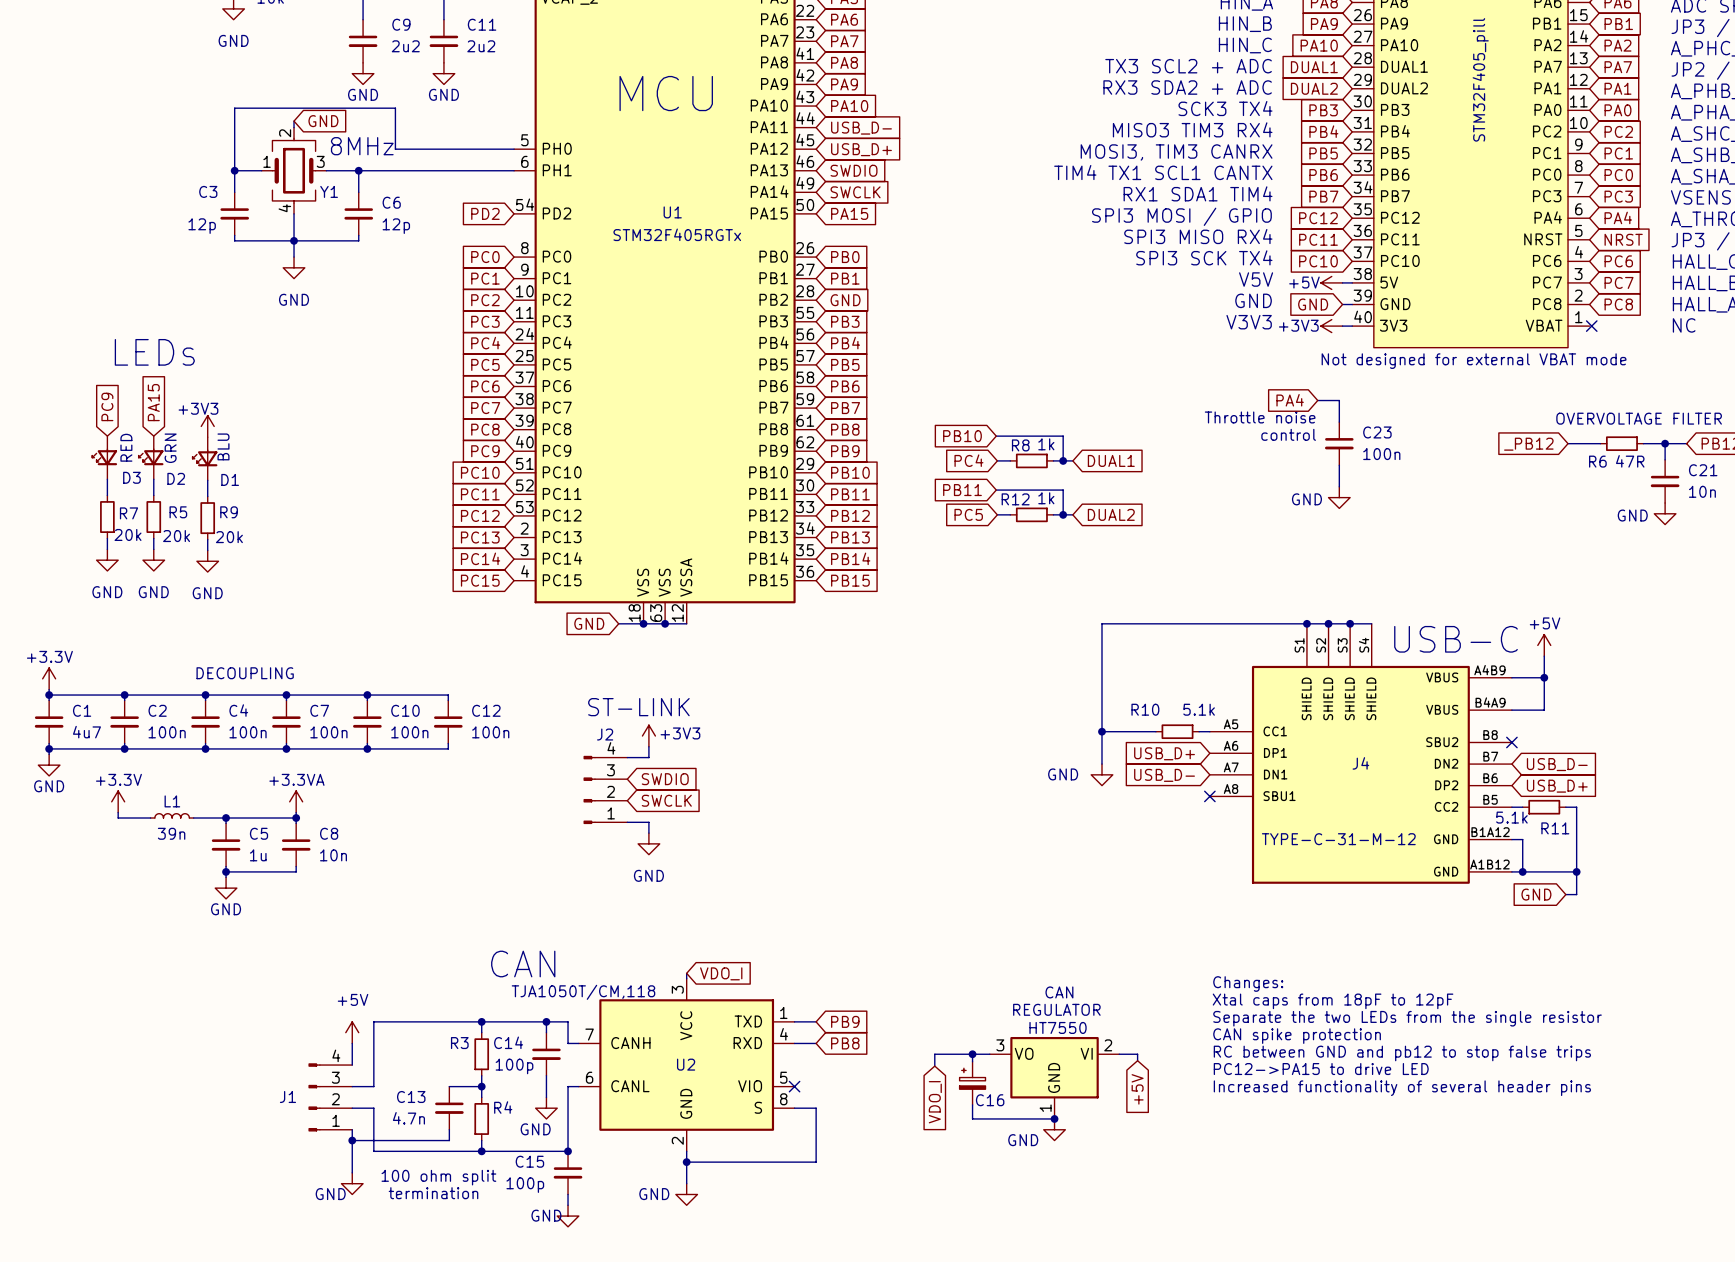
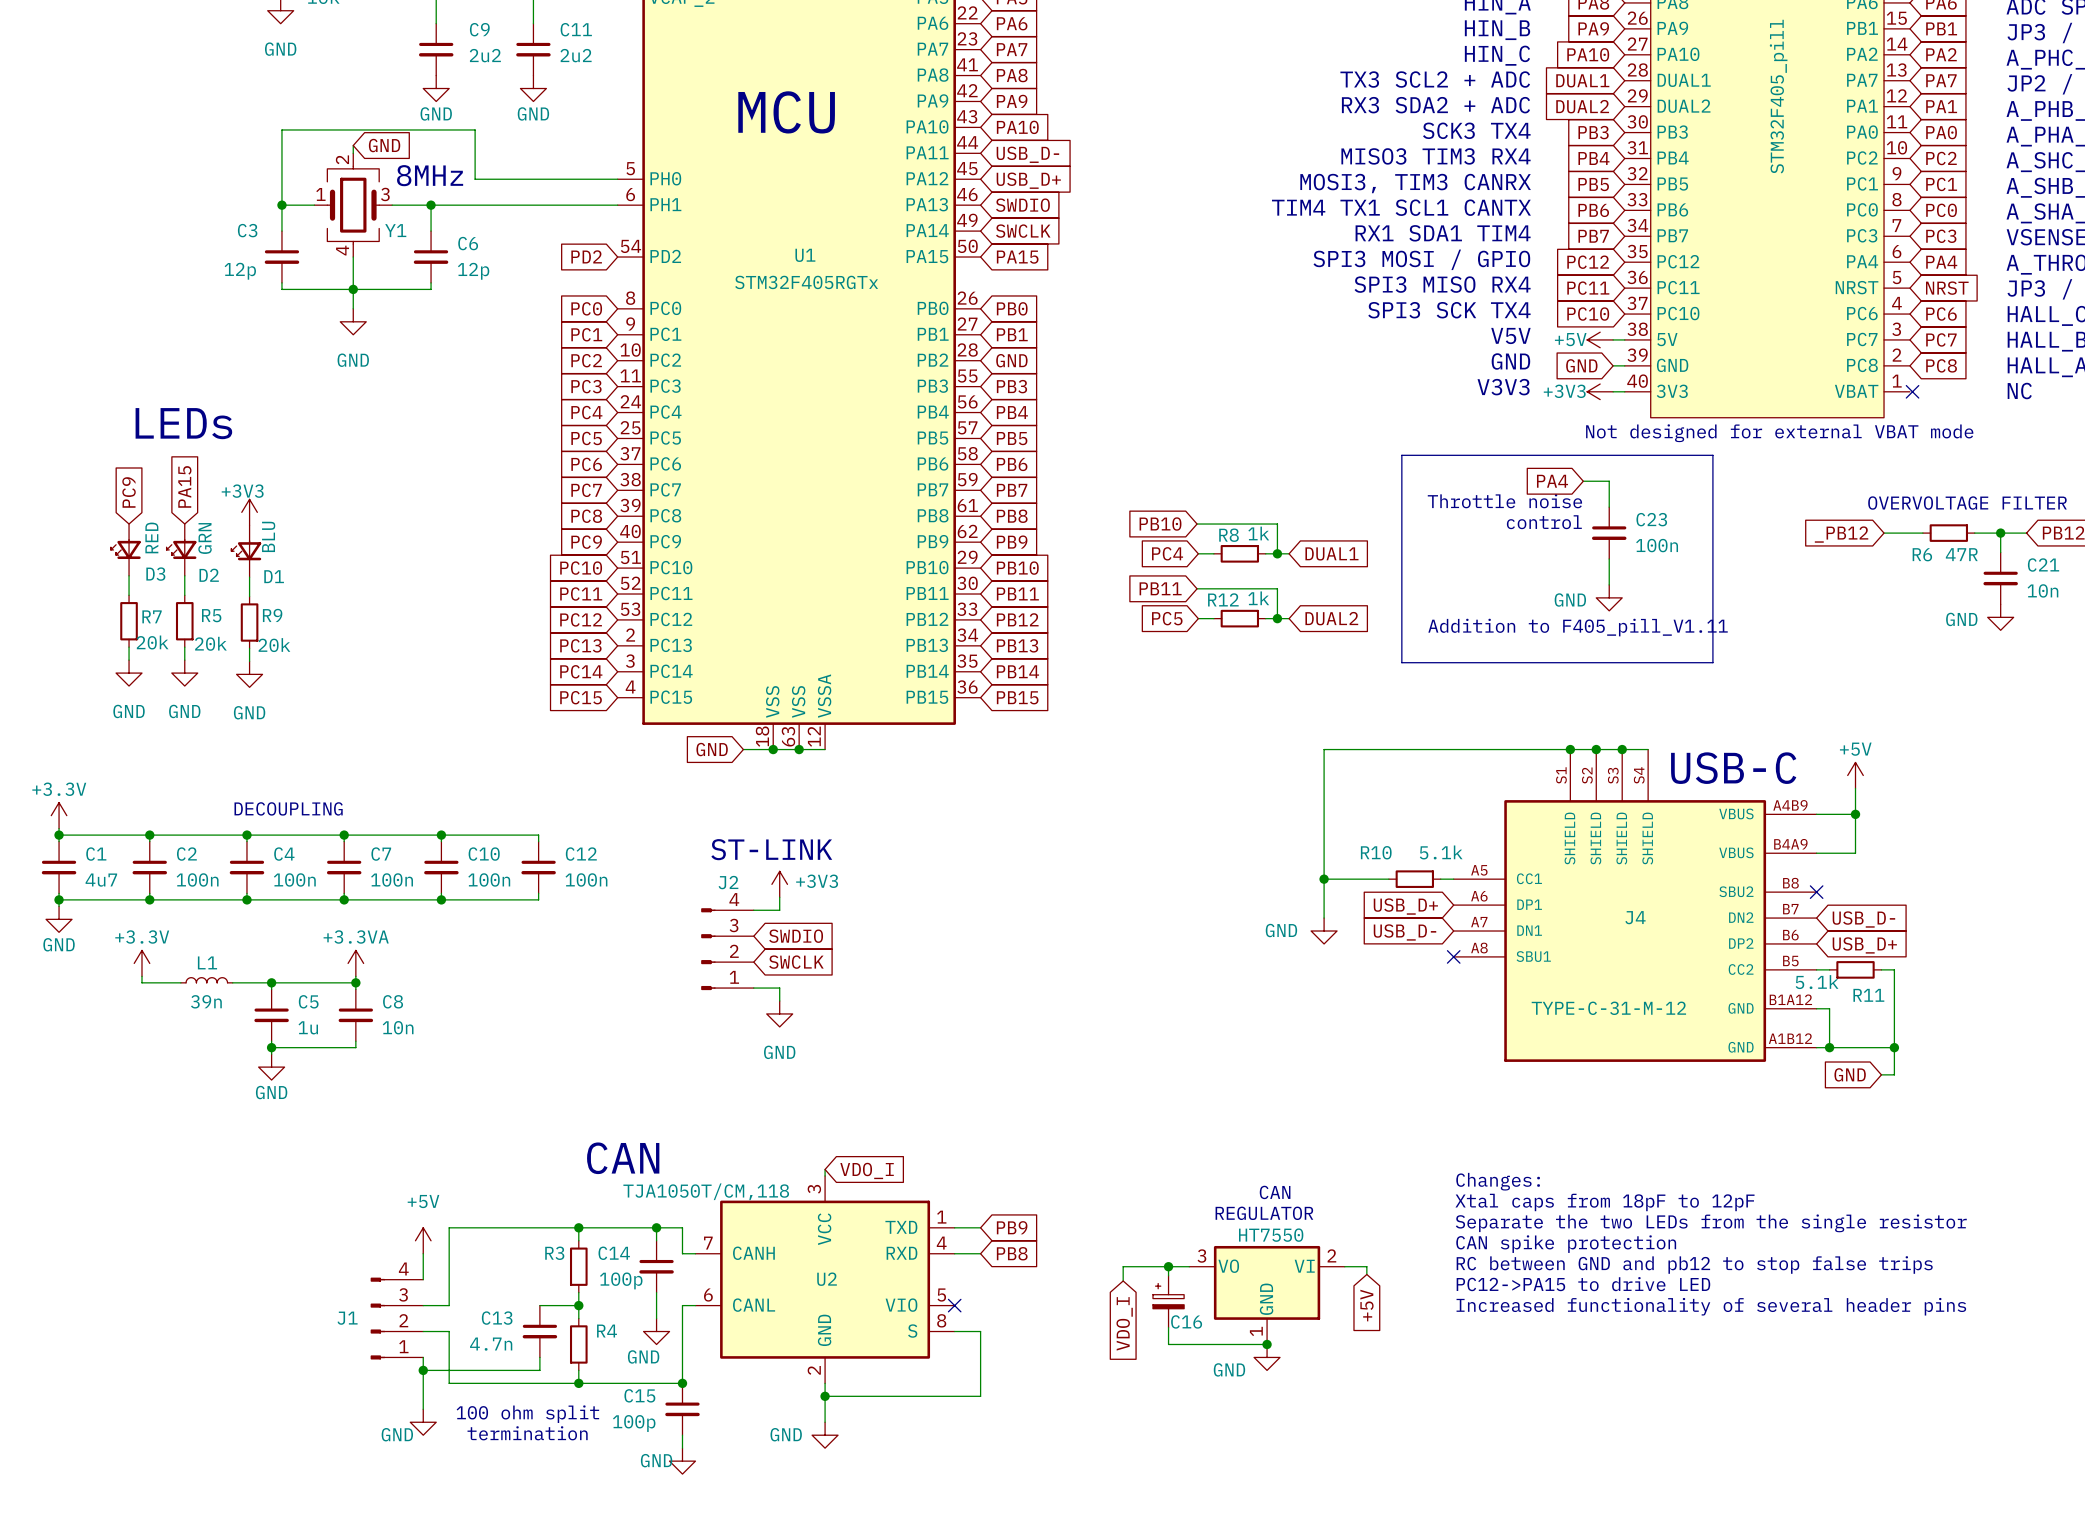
line: none -> (1401, 455) (1712, 455) (1712, 662) (1401, 662) (1401, 455)
text: none -> Addition to F405_pill_V1.11 (1578, 627)

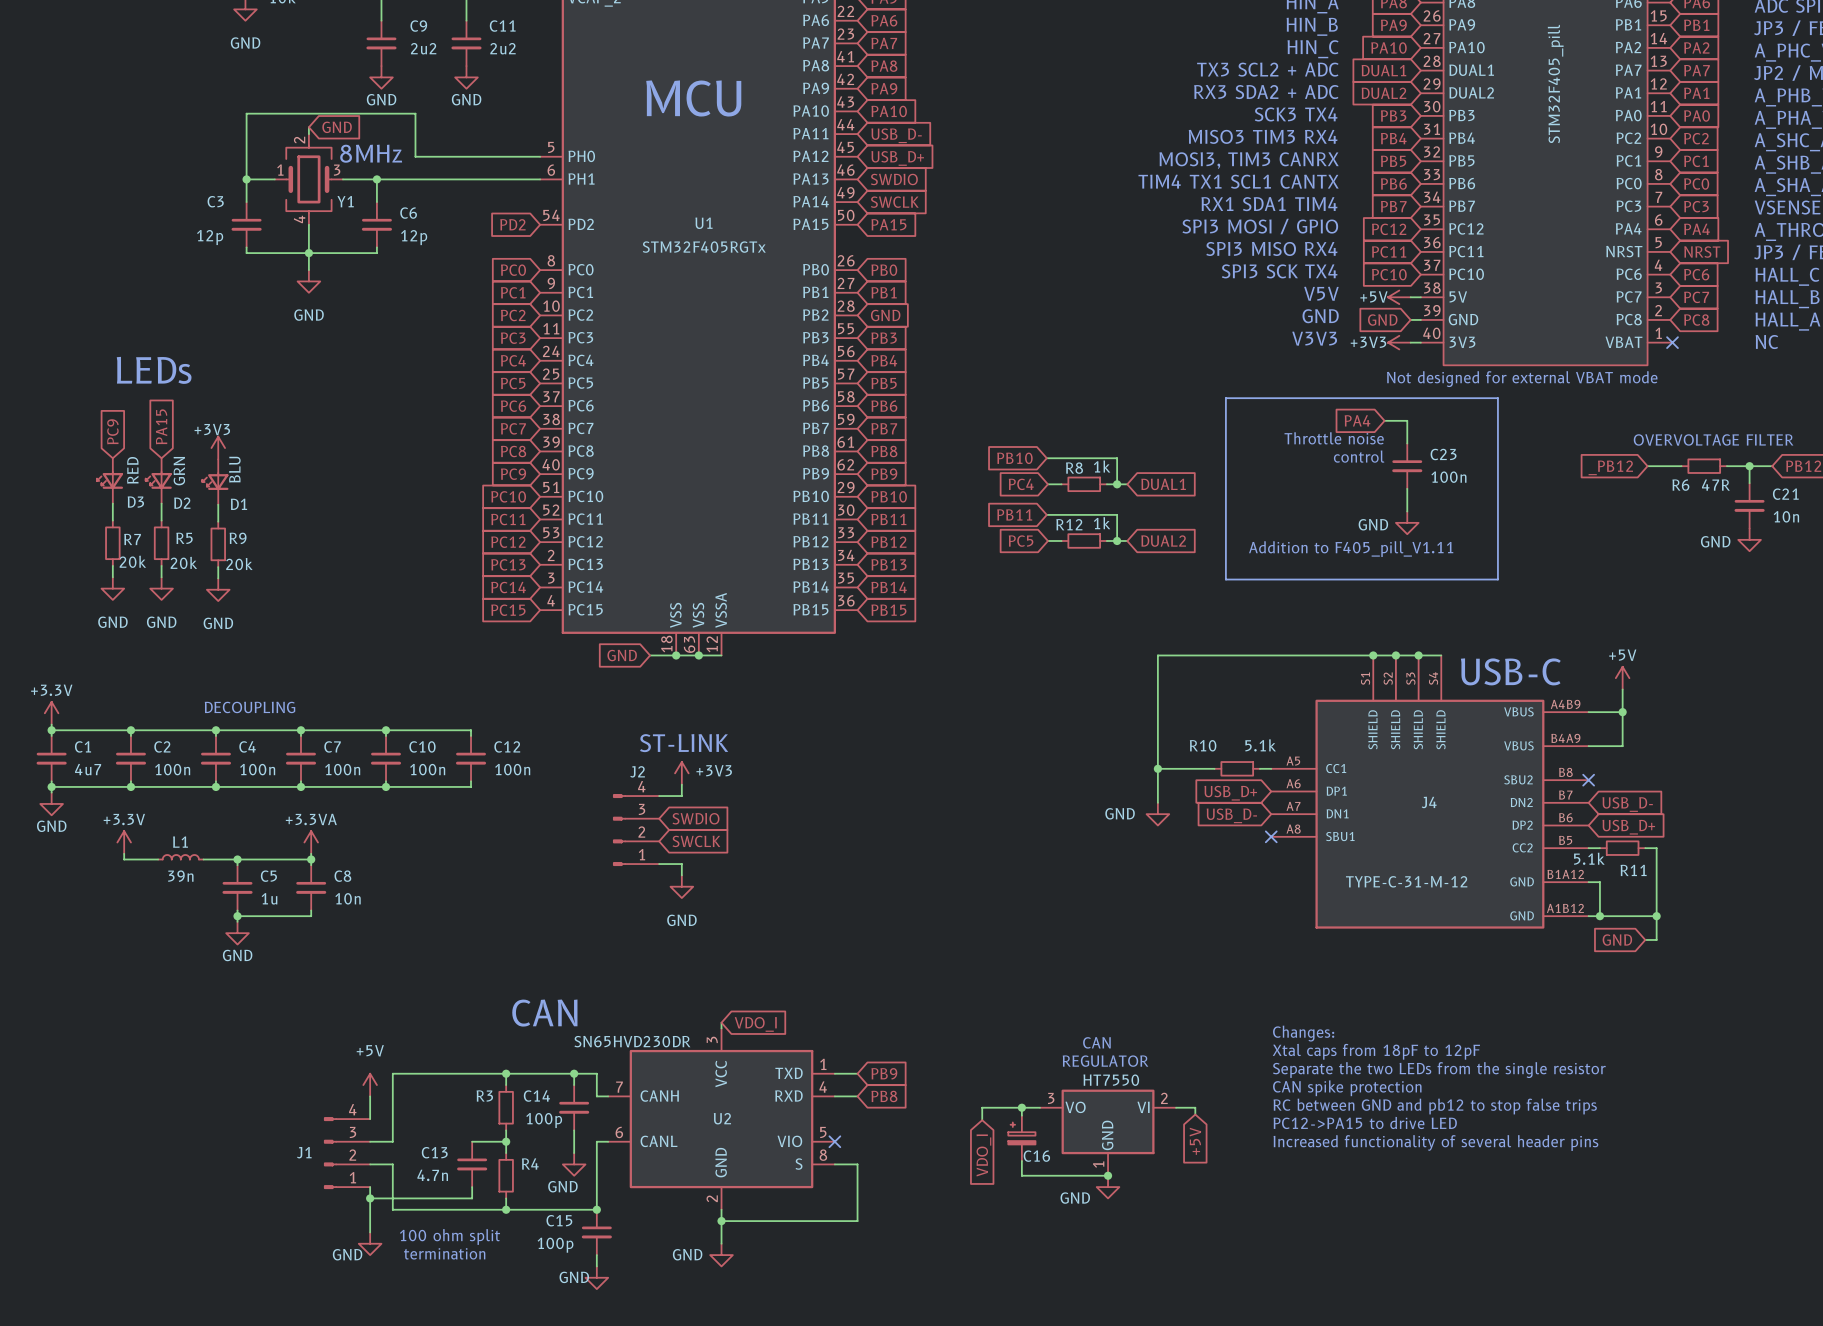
U2 value: TJA1050T/CM,118 (706, 1191) -> SN65HVD230DR (632, 1041)

